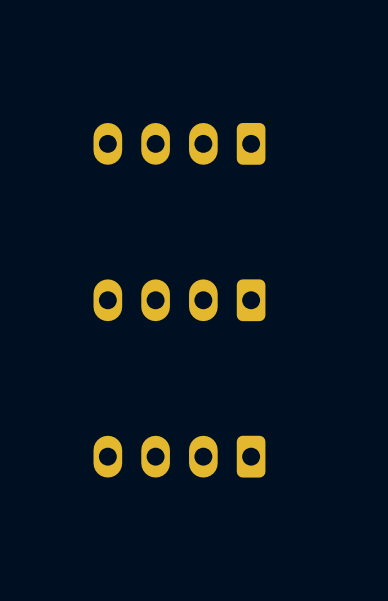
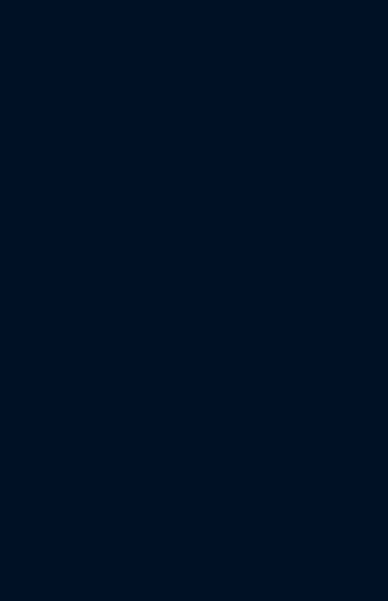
part: (179, 143) -> none
part: (179, 300) -> none
part: (179, 456) -> none

